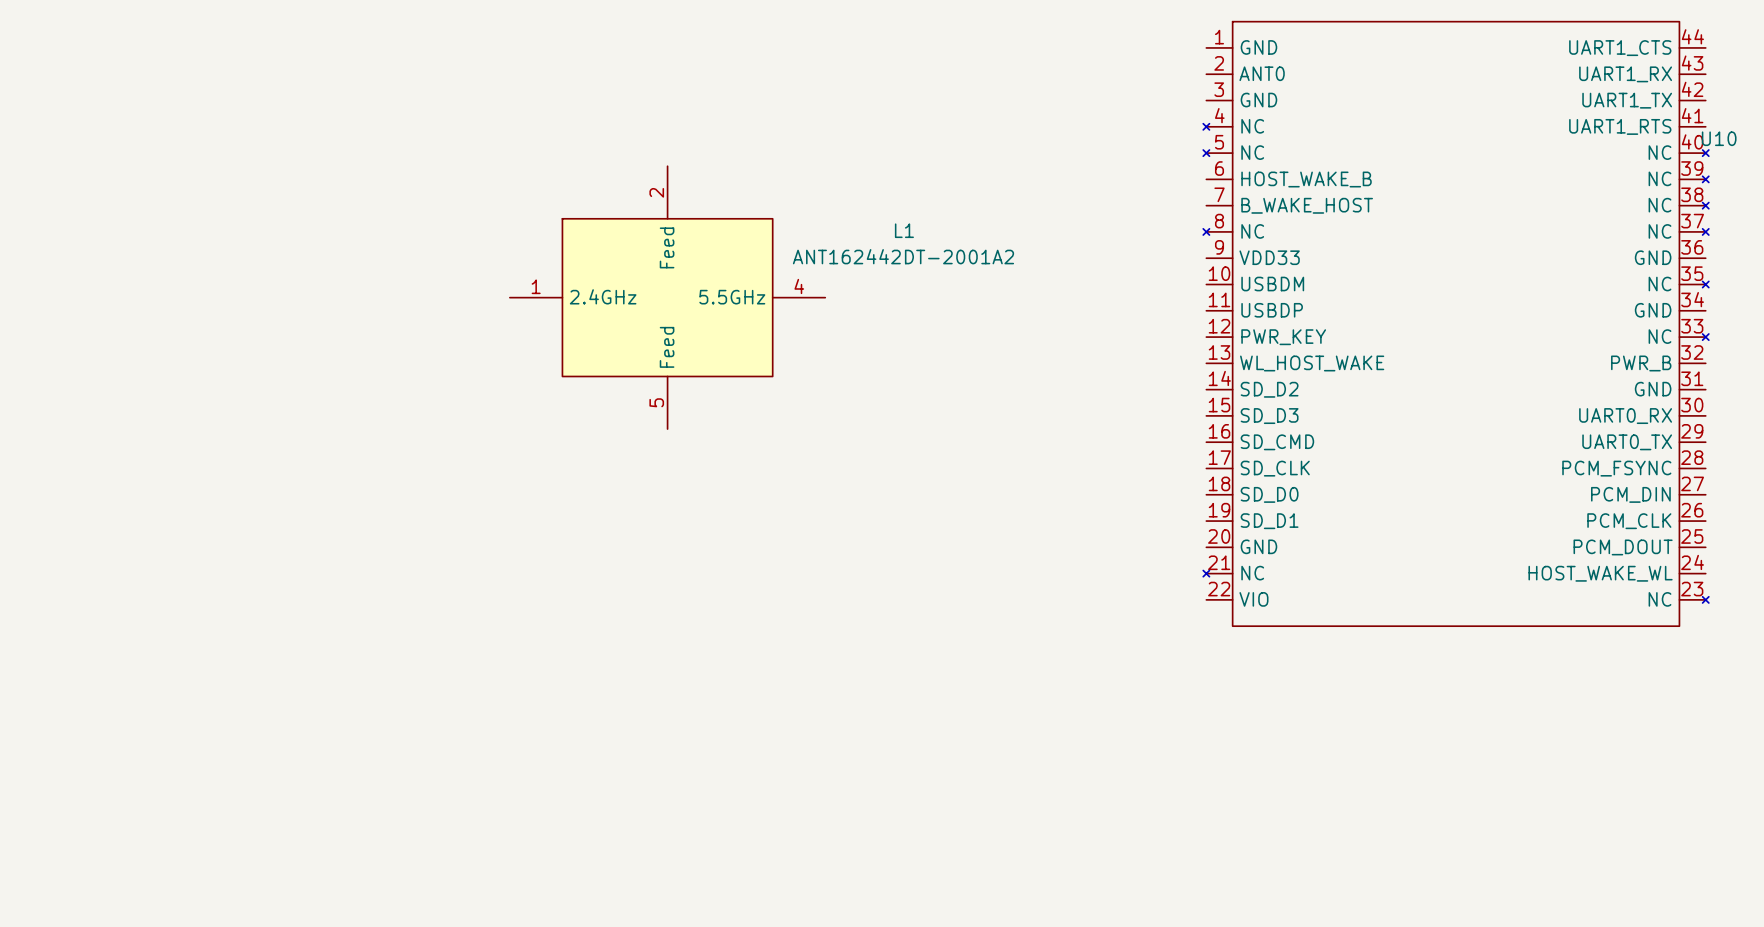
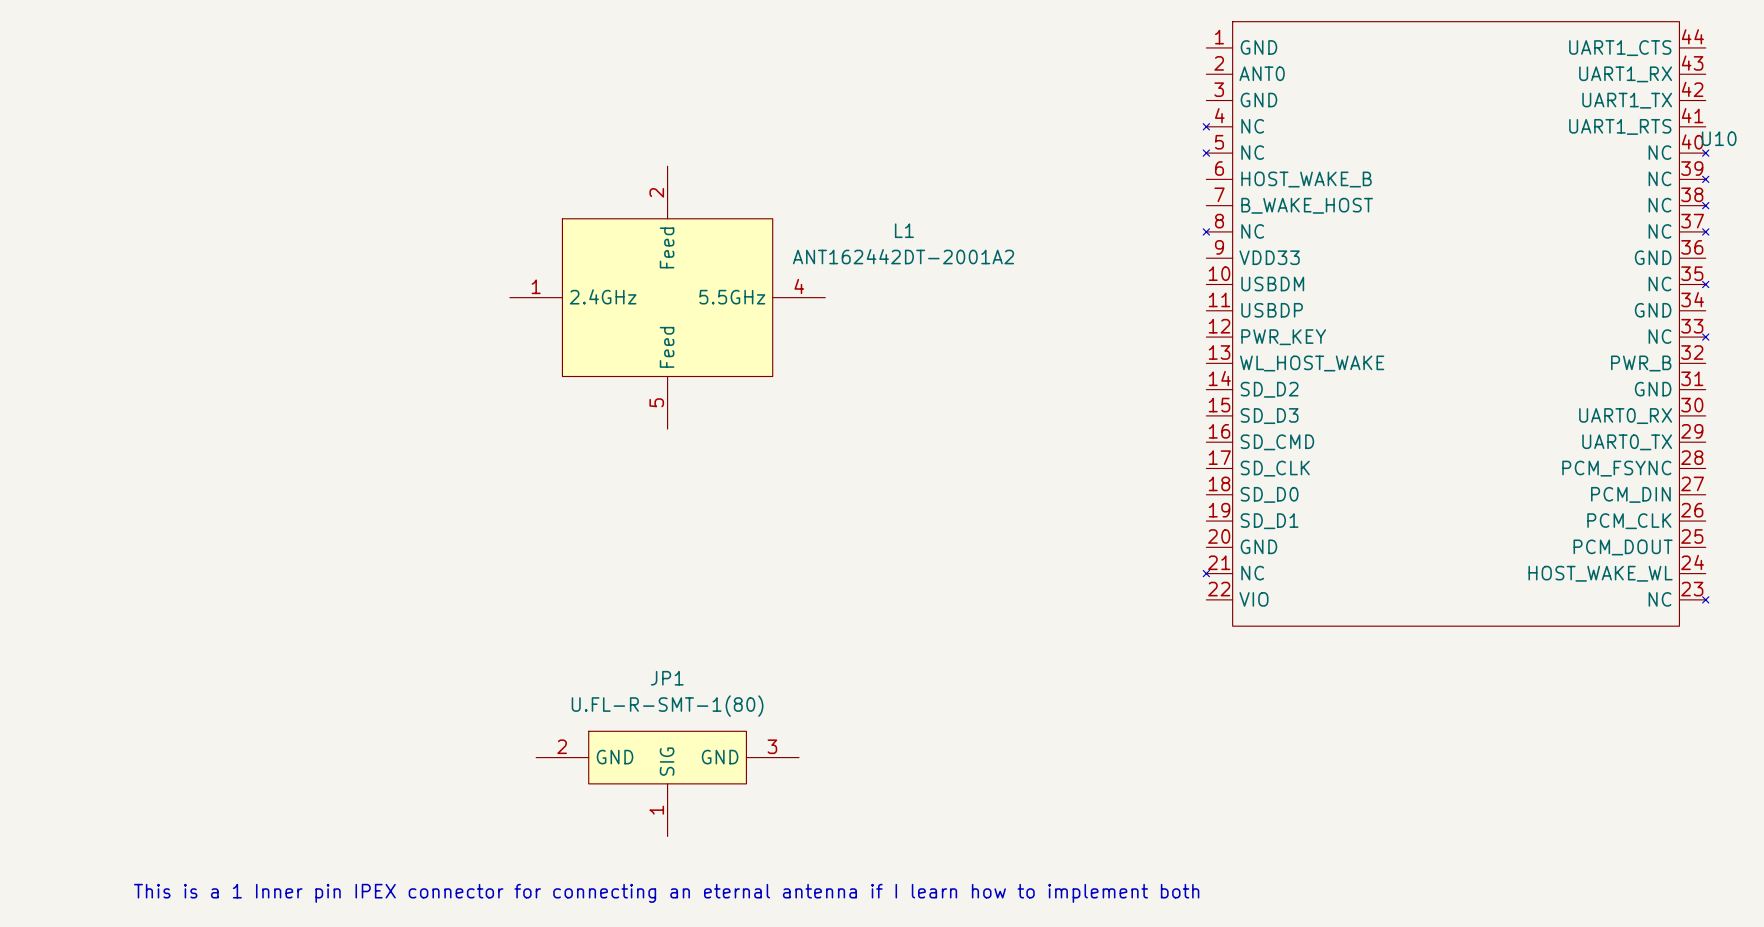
JP1: none -> U.FL-R-SMT-1(80) (667, 783)
text: none -> This is a 1 Inner pin IPEX connector for connecting an eternal antenna if I learn how to implement both (666, 893)

